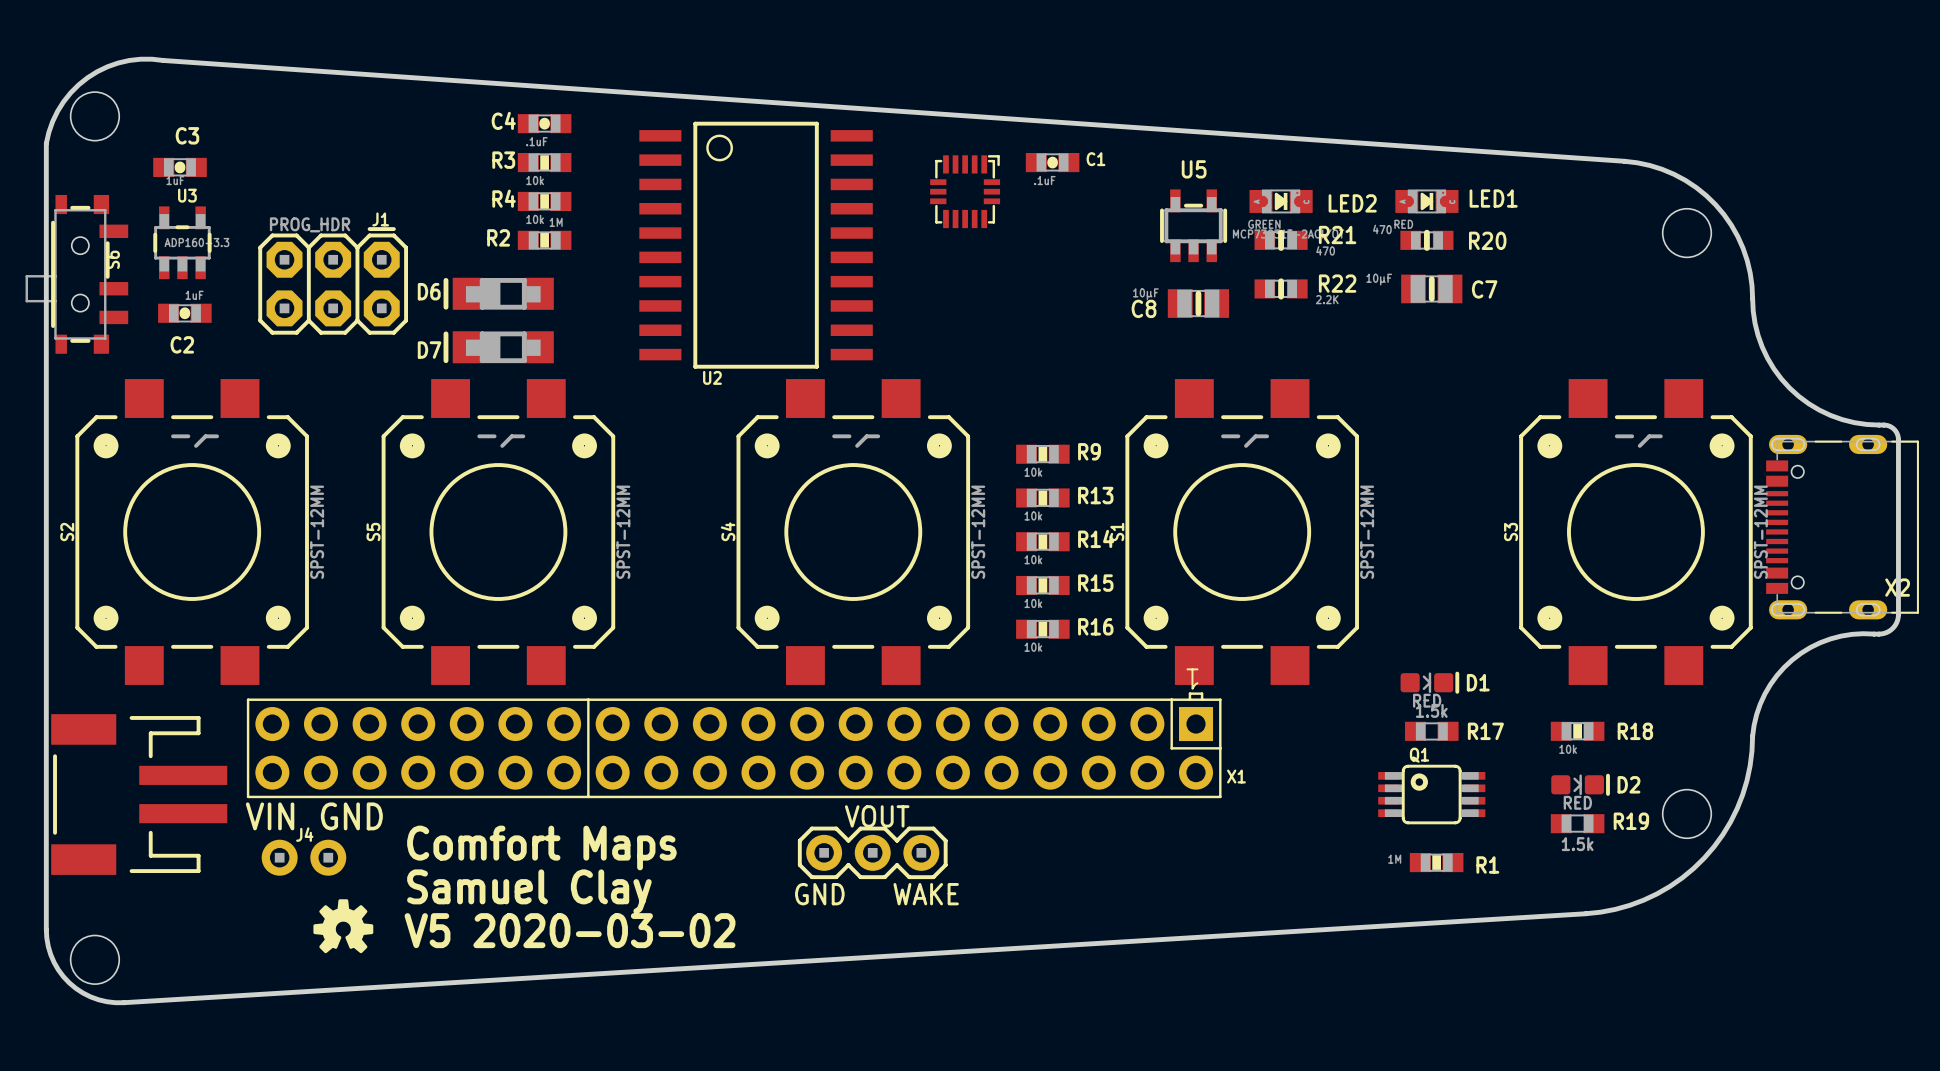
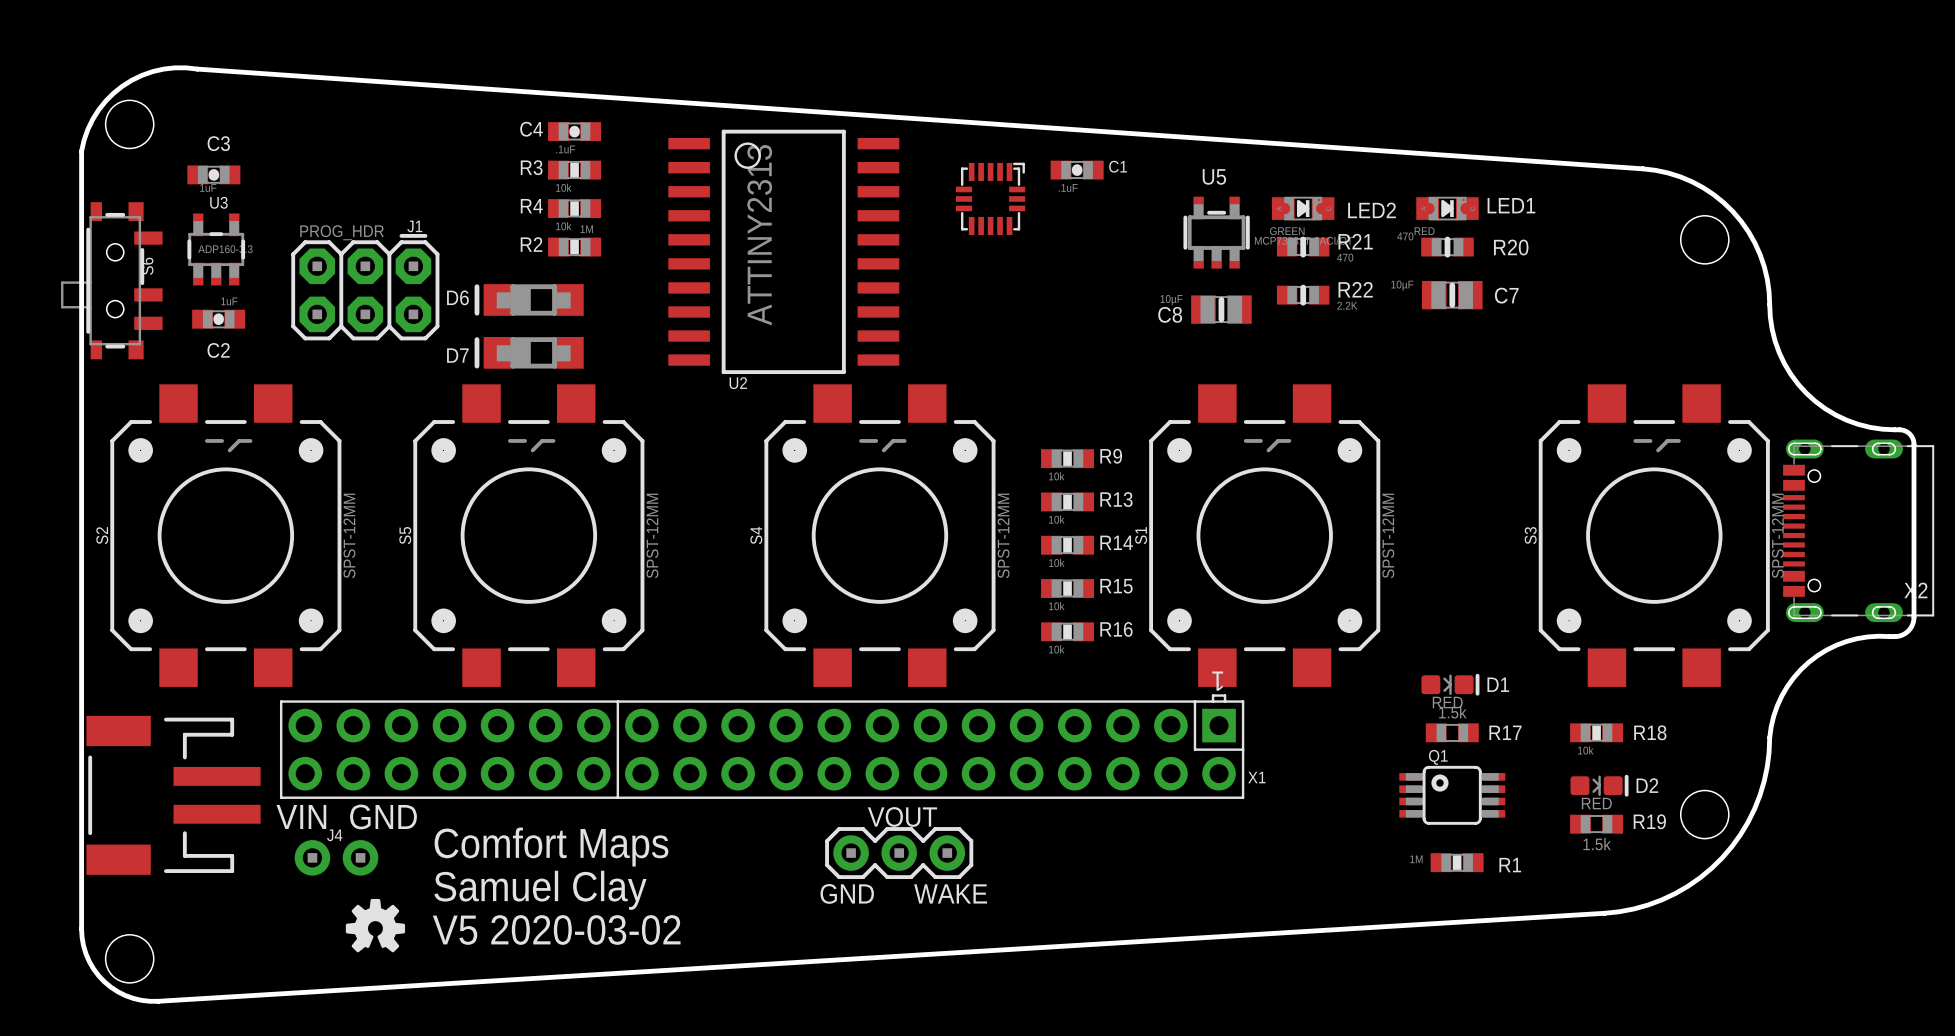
U2 value: none -> ATTINY2313 (759, 235)

